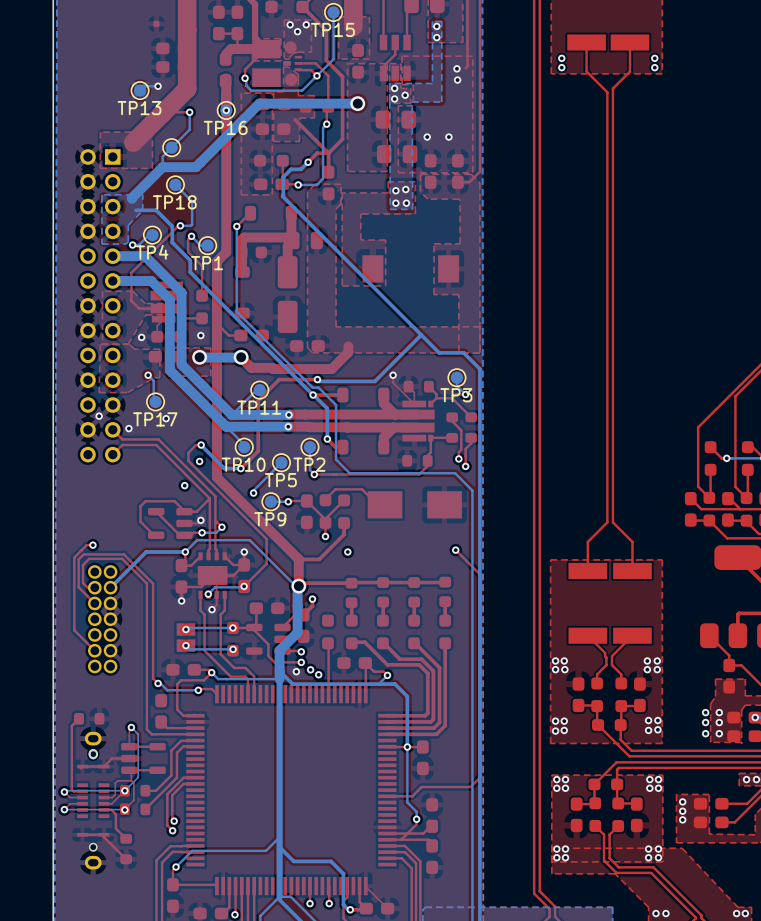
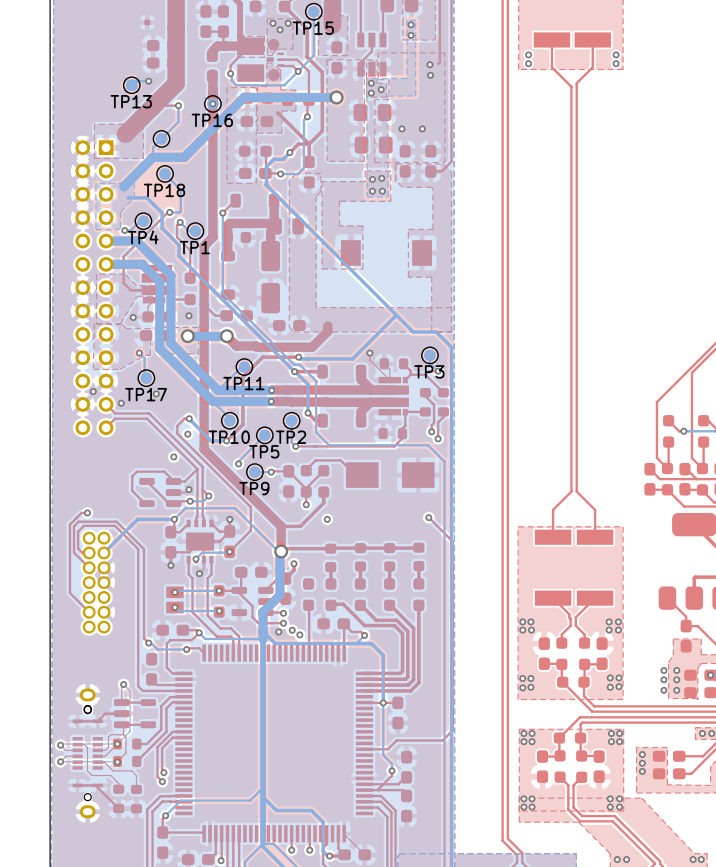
top track: (78, 718) (71, 725) (71, 789) (73, 791) (82, 791) -> (118, 789) (118, 783) (110, 775) (92, 775) (87, 770) (87, 747) (84, 744) (77, 744)
part rotation: 0° (89, 718) -> 90° clockwise (136, 799)
part position: (89, 718) -> (136, 799)
top track: (110, 809) (115, 814) (115, 828) (126, 838) -> (104, 762) (113, 770) (131, 770) (136, 775) (136, 789)

